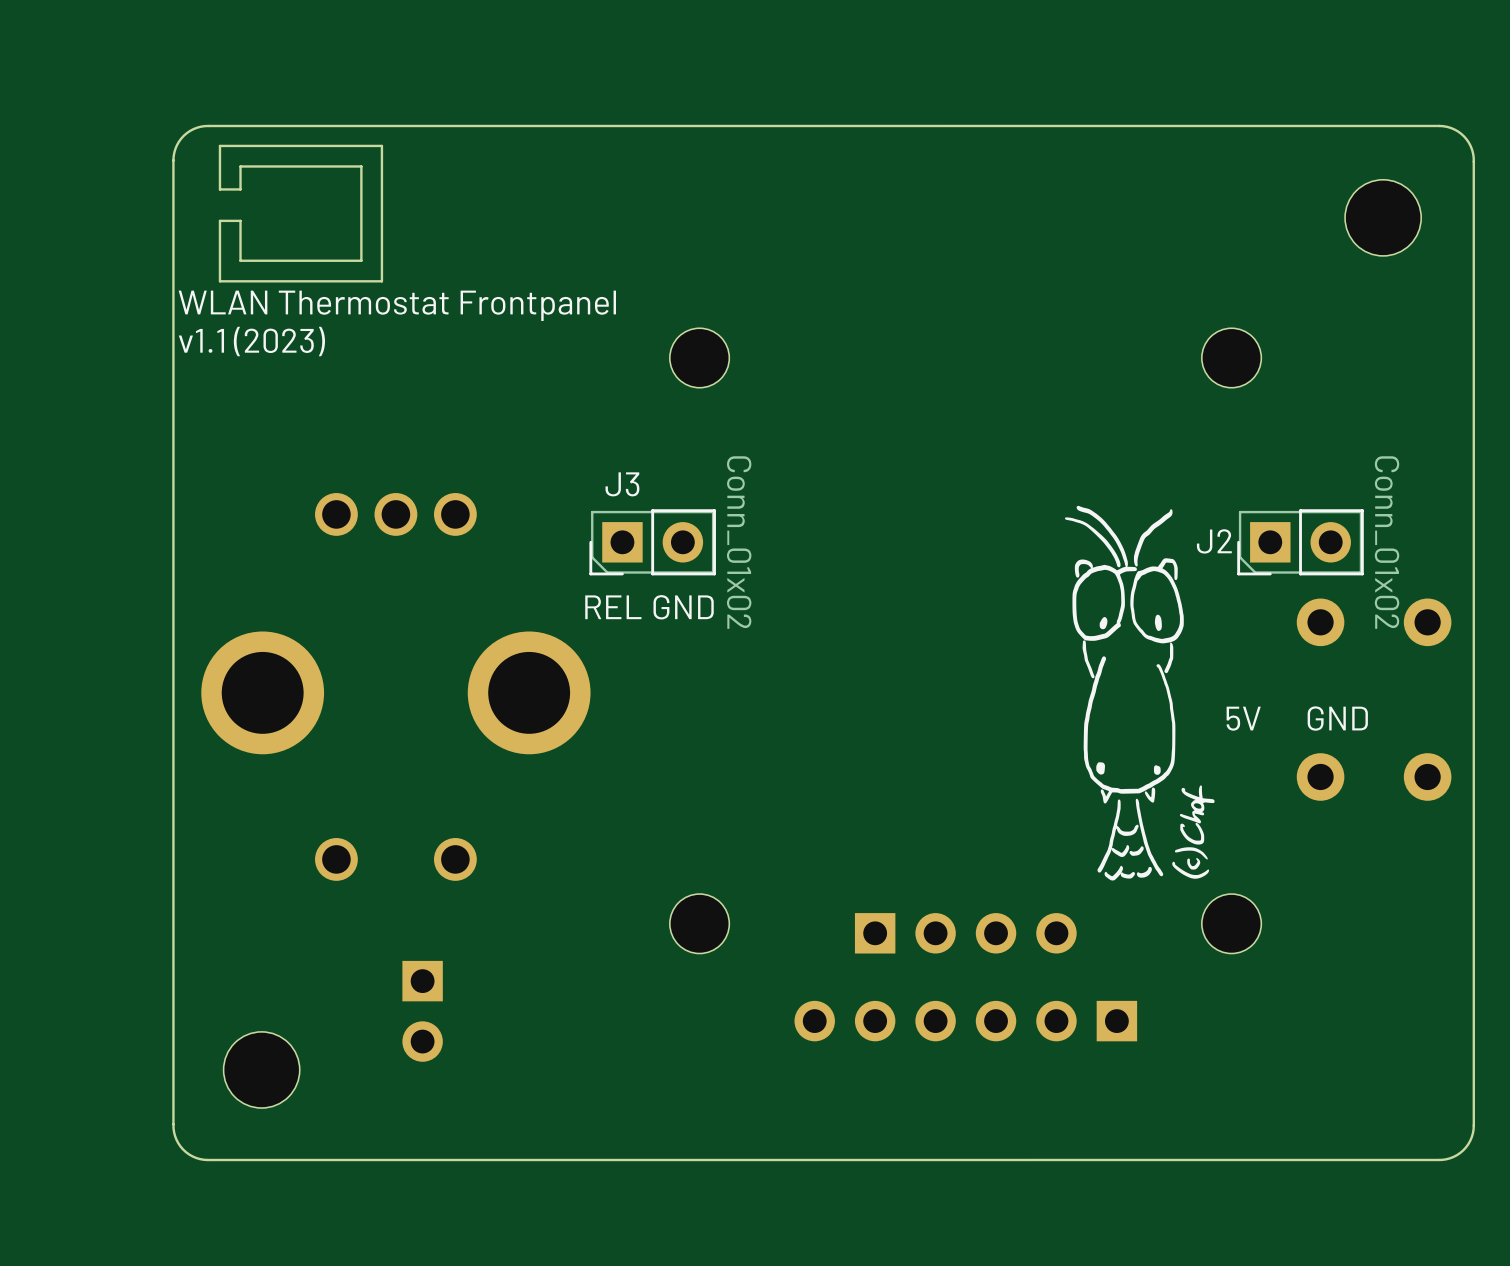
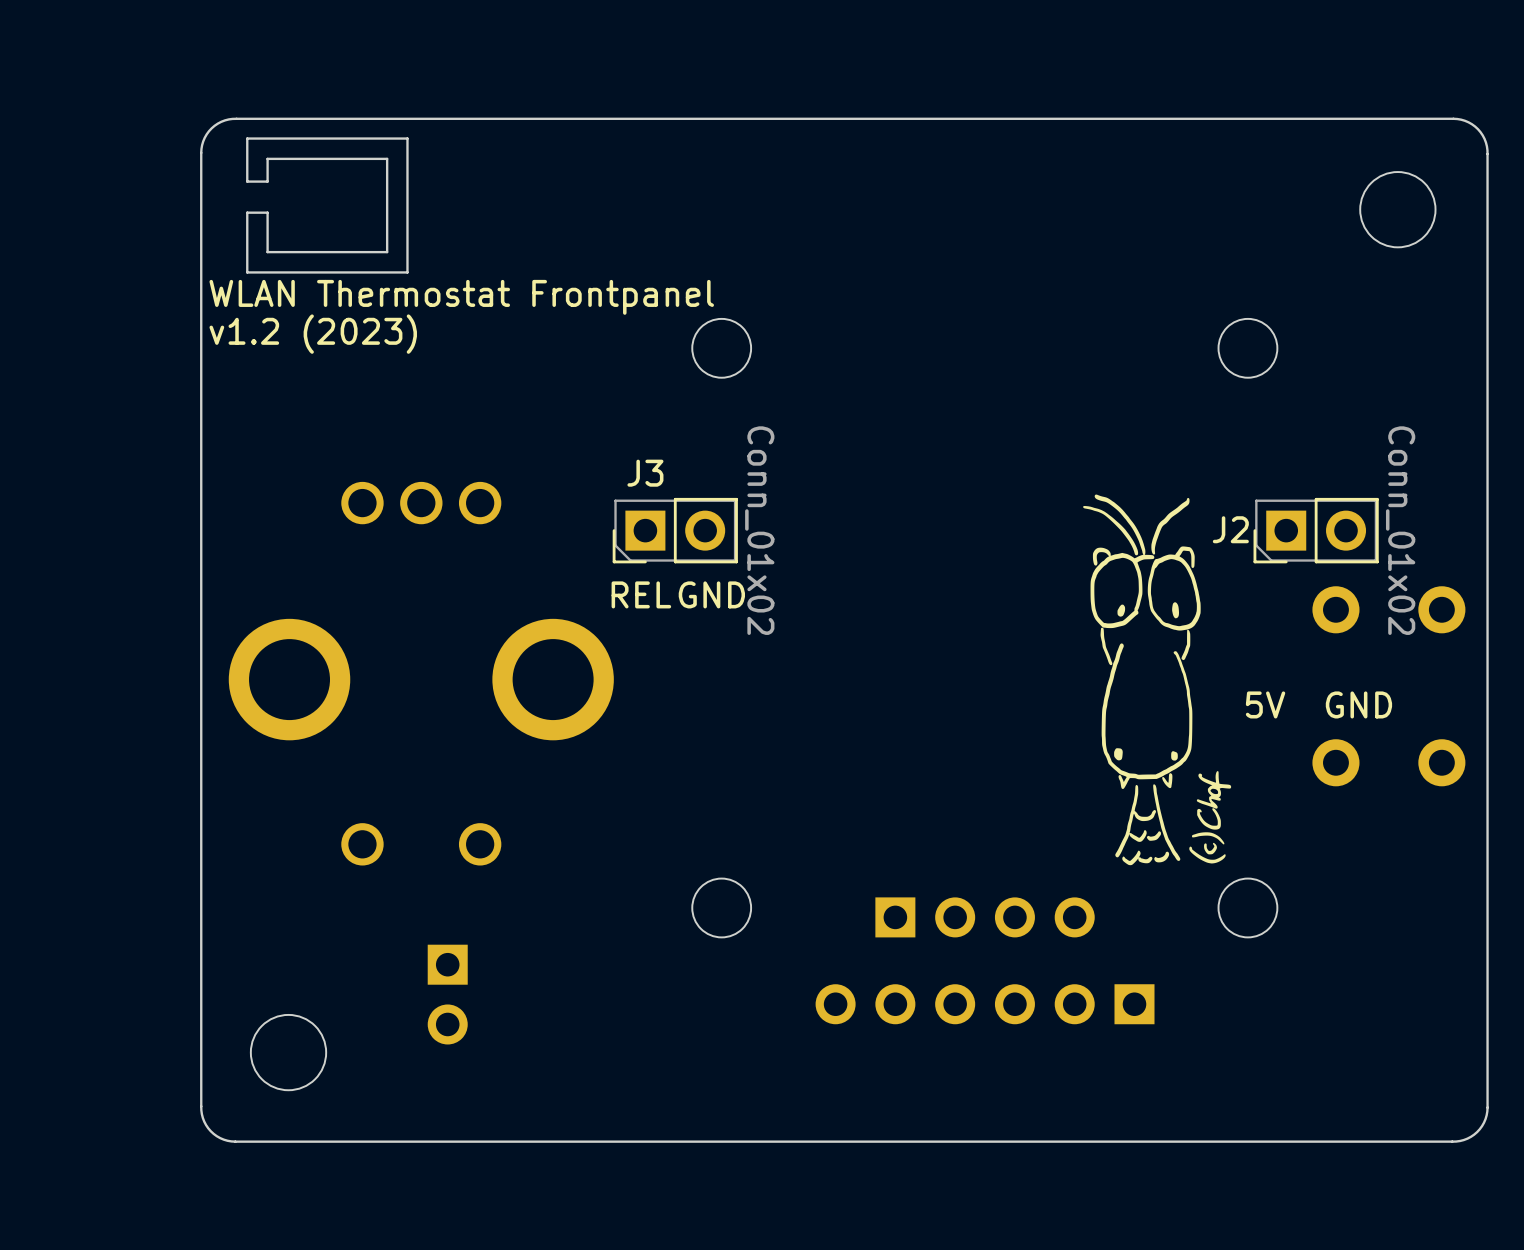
text: v1.1 (2023) (251, 341) -> v1.2 (2023) (313, 334)

